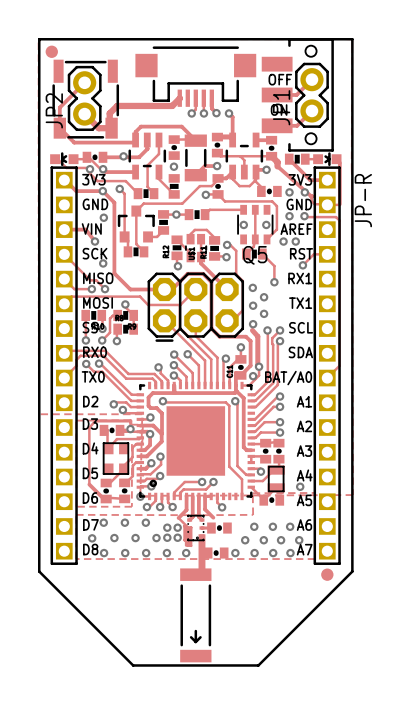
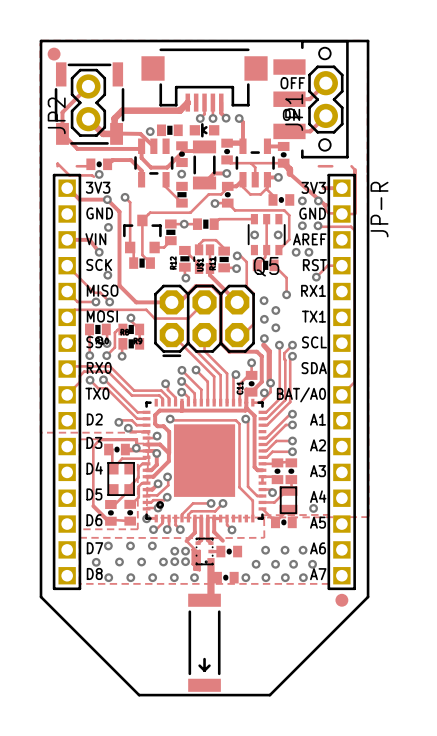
part: none -> (169, 130)
part: none -> (204, 130)
via: none -> (150, 131)
track: none -> (116, 133) (140, 133) (153, 146) (153, 151)
track: (174, 139) (195, 140) (181, 126) (141, 126) (135, 132) (135, 139) -> (204, 150) (182, 151) (167, 167) (150, 167) (141, 157) (141, 146)
track: (147, 140) (147, 148) (139, 157) (103, 157) -> none
track: (158, 145) (158, 154) (147, 165) (147, 186) (154, 193) -> none
track: none -> (111, 161) (130, 160) (141, 170) (141, 185)
via: (123, 156) -> none
track: (86, 157) (106, 172) (135, 172) -> none
part: (64, 159) -> none
track: (289, 159) (310, 180) -> none
part: (297, 159) -> none
part: (327, 159) -> none
via: none -> (99, 174)
track: (89, 168) (89, 173) (97, 181) (125, 181) (138, 193) -> none
via: (89, 169) -> none
via: (103, 169) -> none
part: (146, 193) -> none

